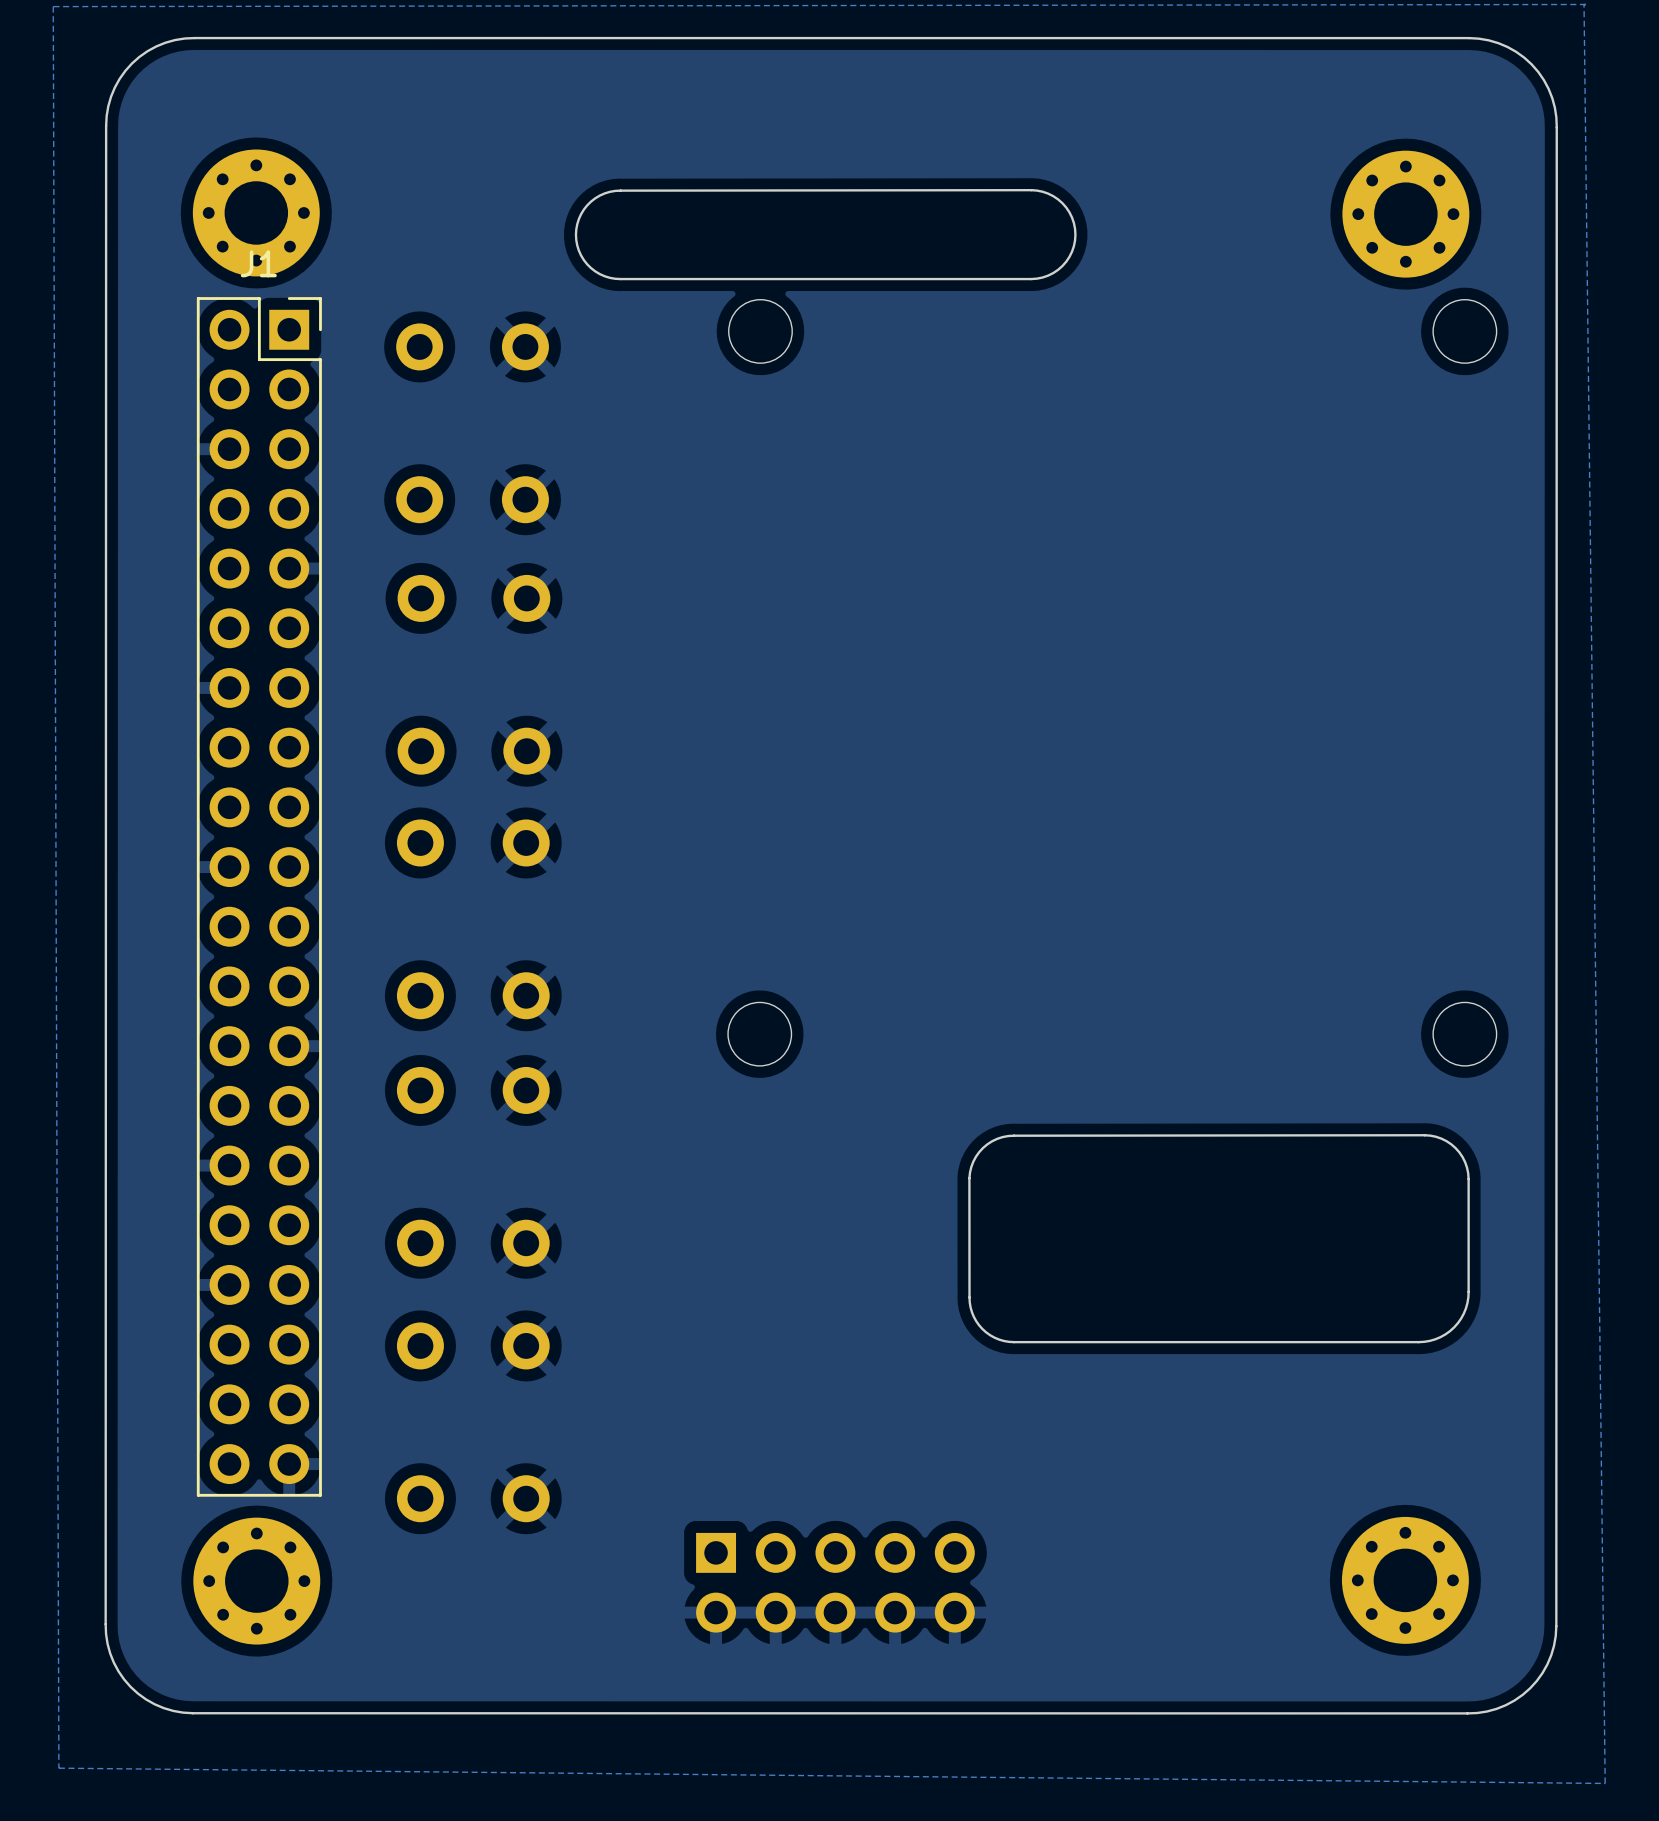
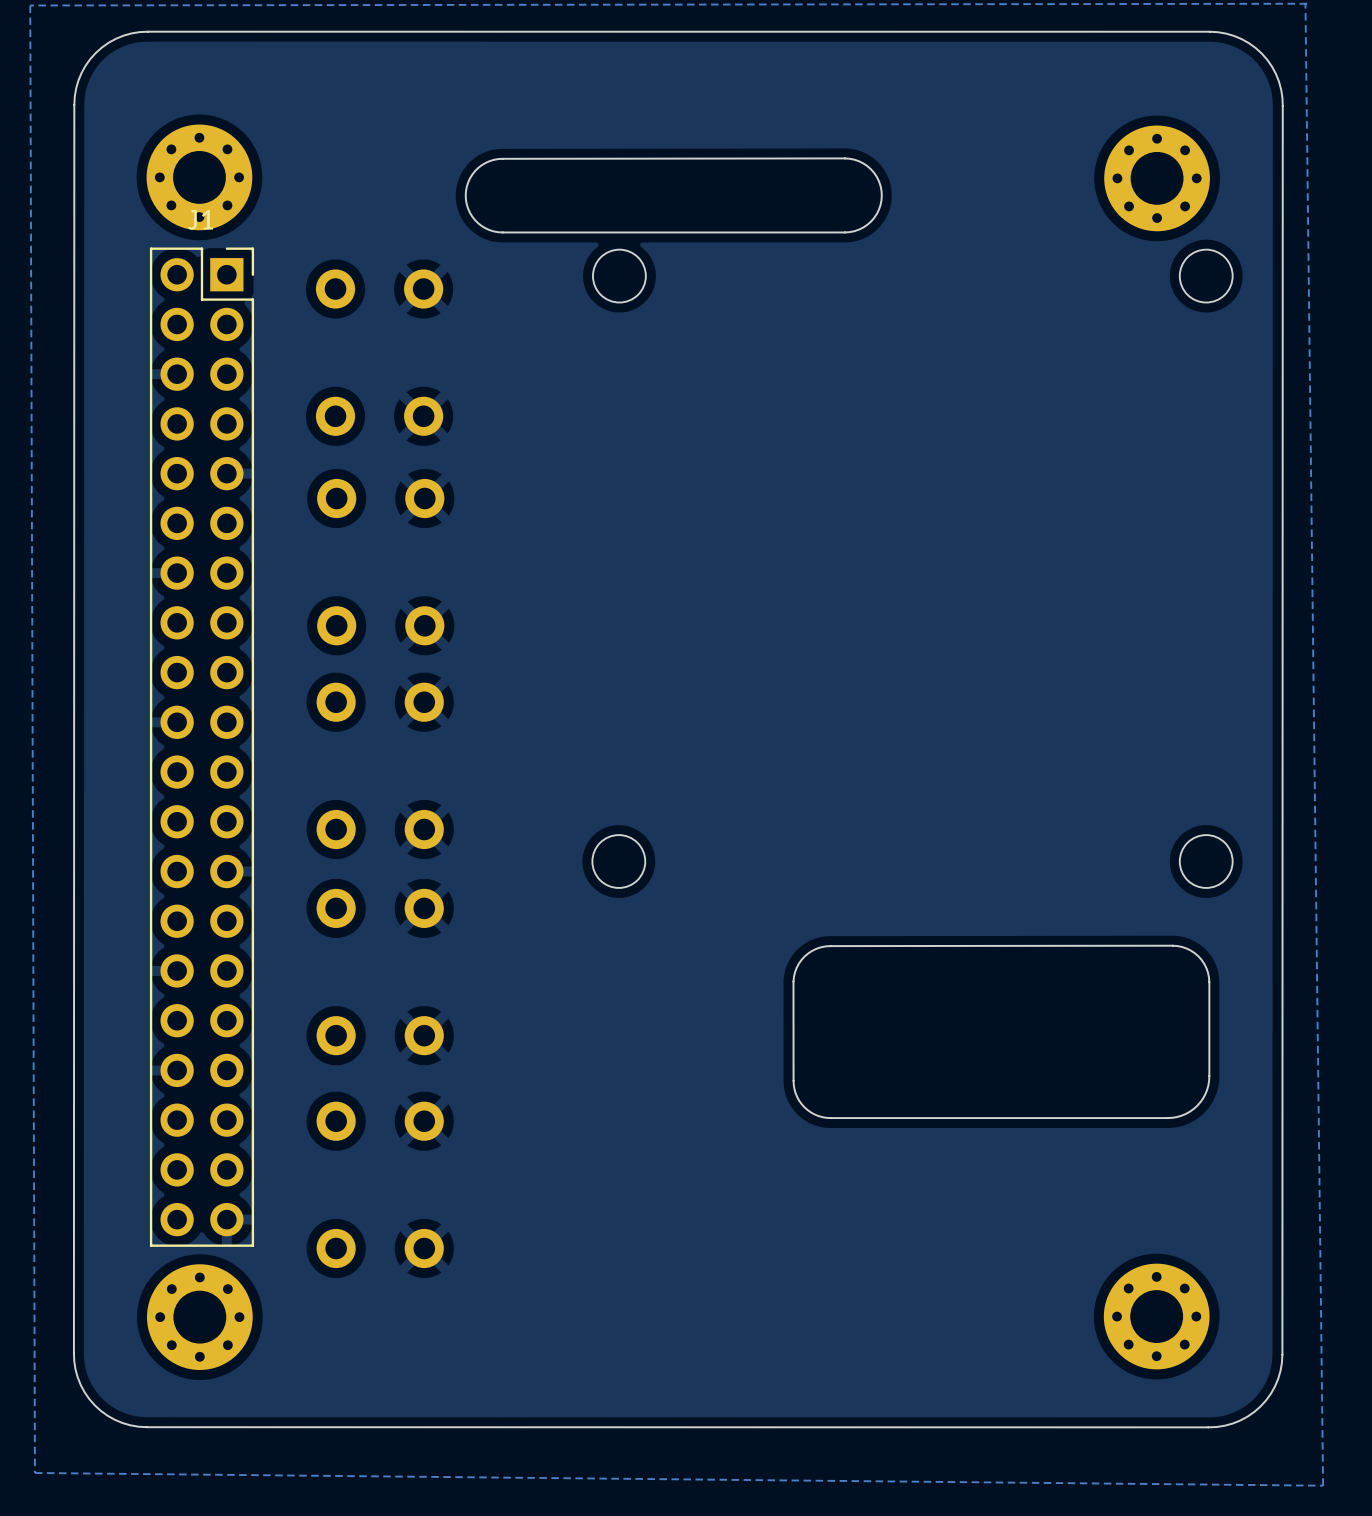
part: (835, 1582) -> none

